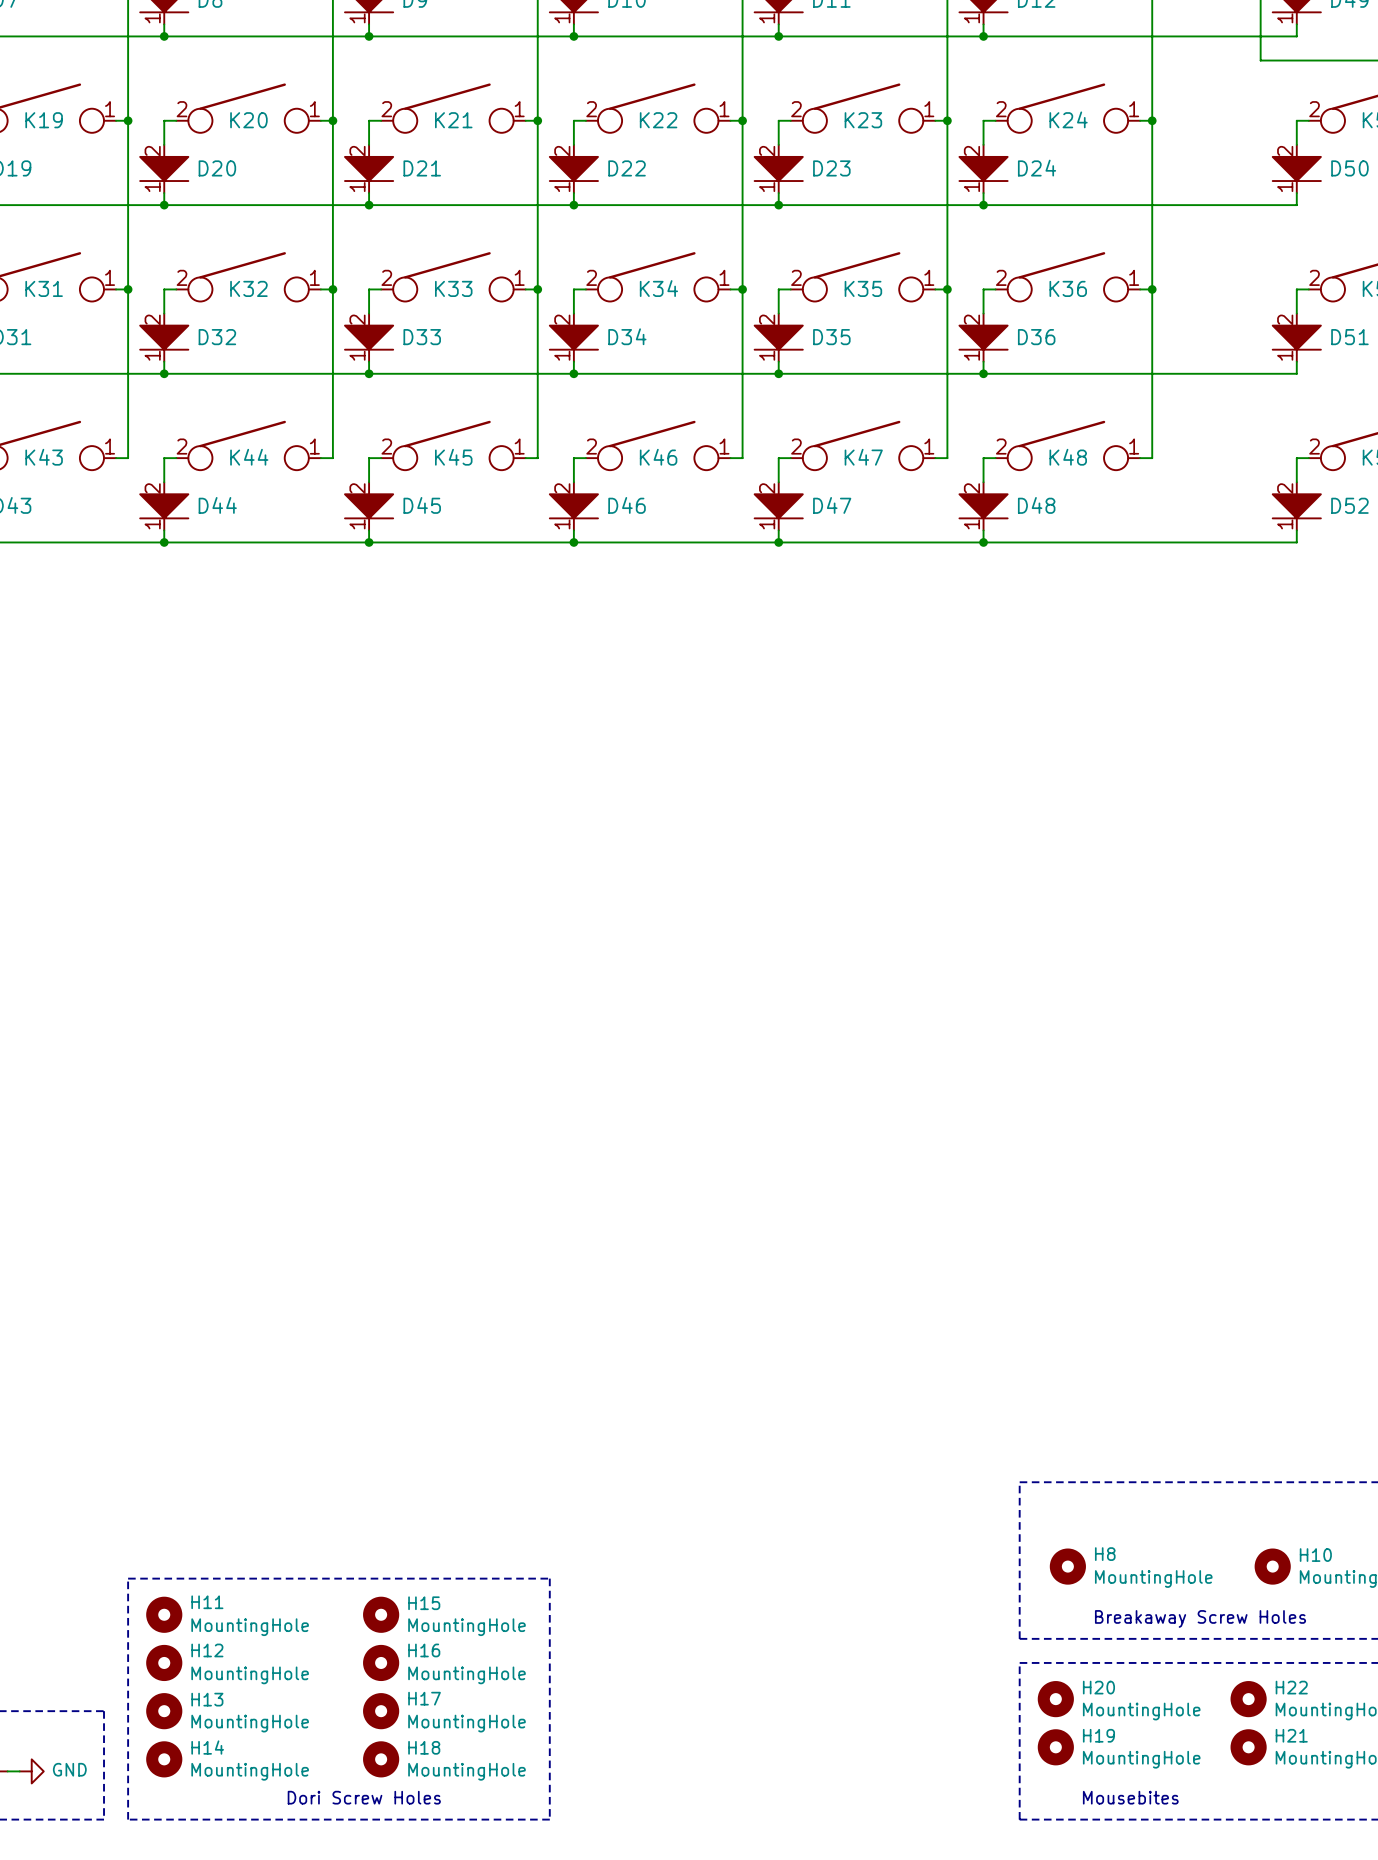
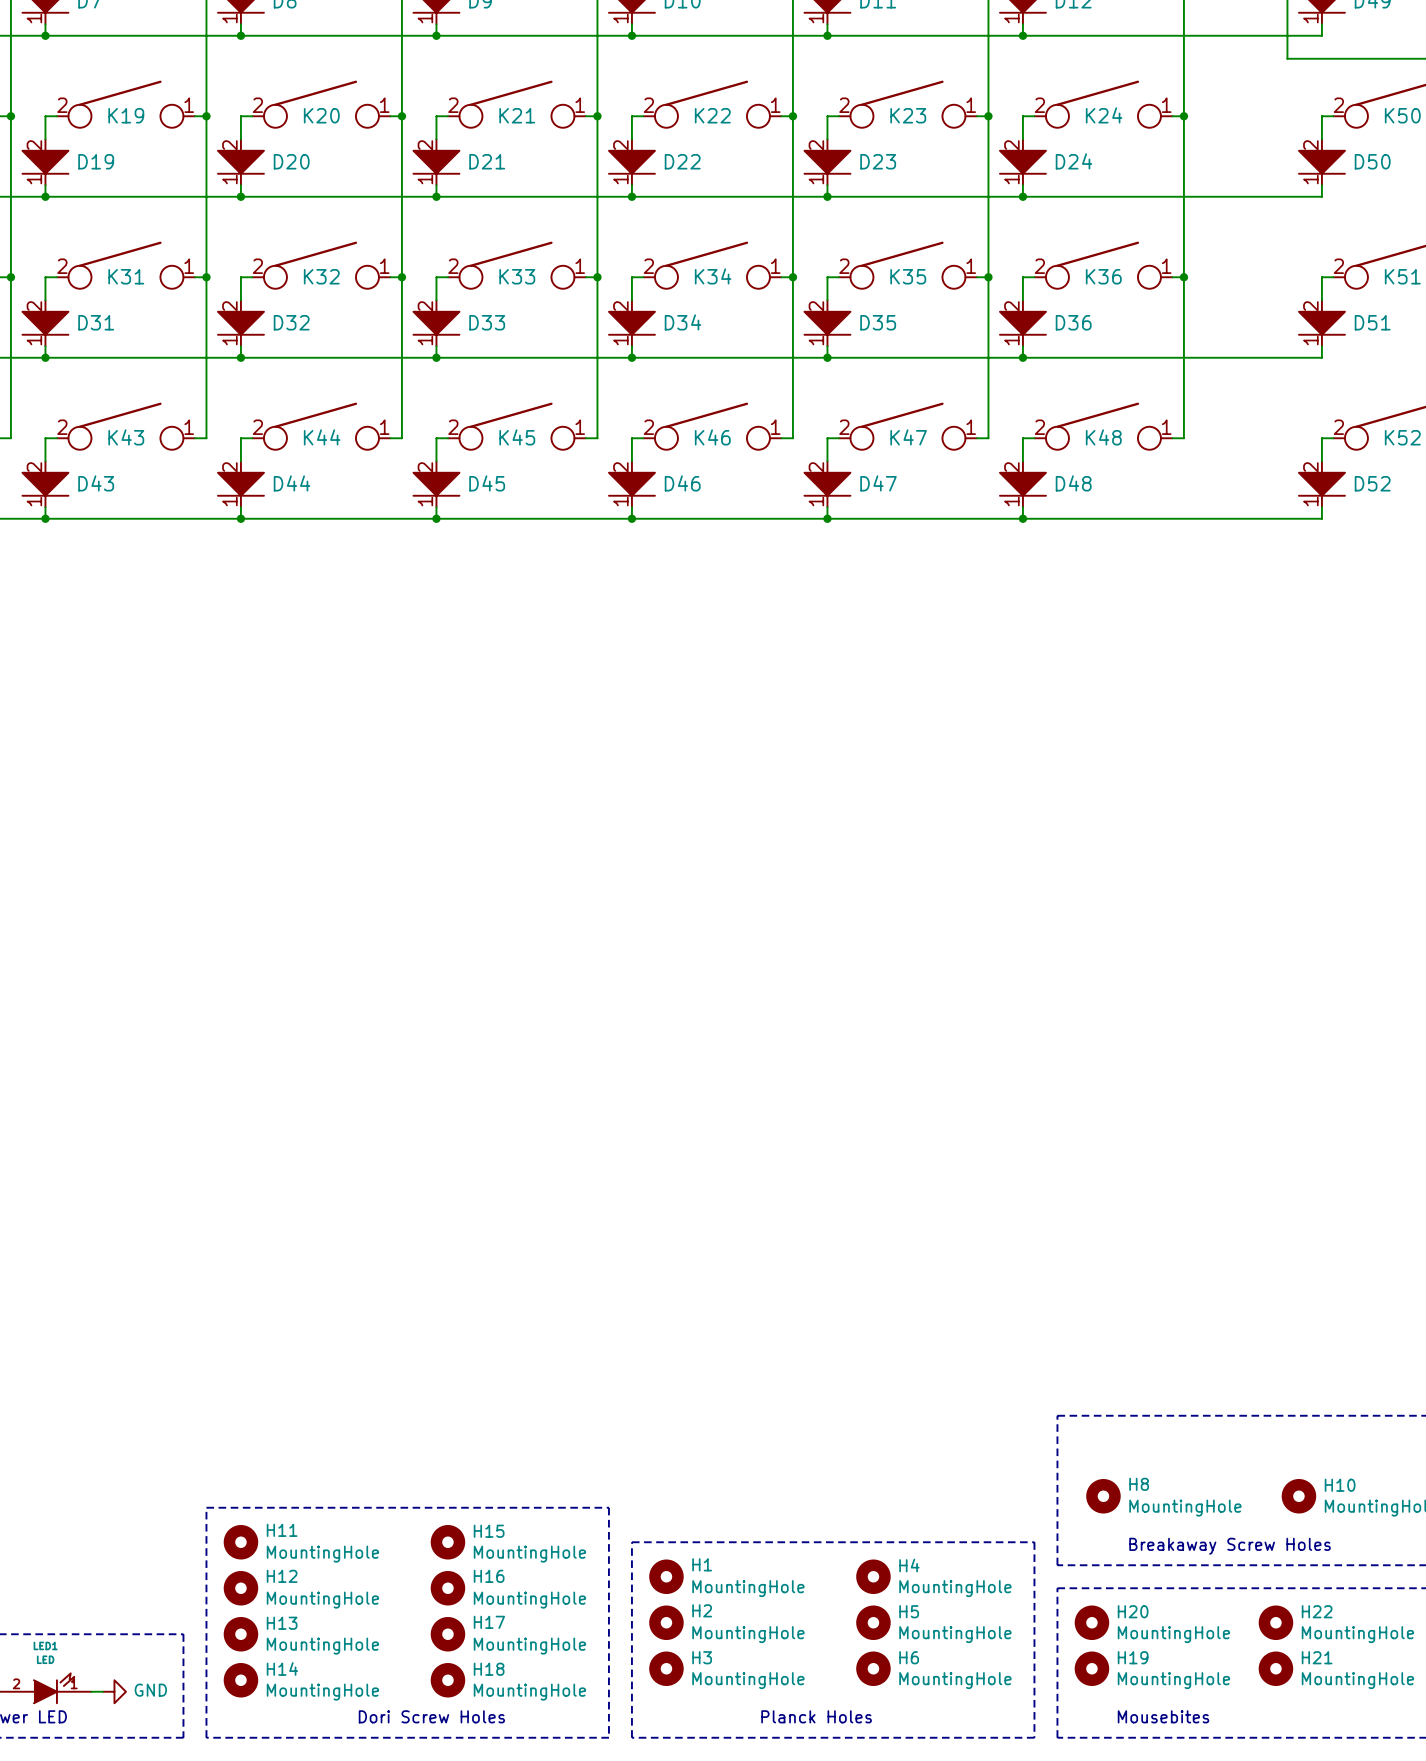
line: none -> (631, 1542) (631, 1737) (1034, 1737) (1034, 1542) (631, 1542)
H1: none -> MountingHole (666, 1576)
H4: none -> MountingHole (873, 1576)
H2: none -> MountingHole (666, 1622)
H5: none -> MountingHole (873, 1622)
H3: none -> MountingHole (666, 1668)
H6: none -> MountingHole (873, 1668)
text: none -> Planck Holes (816, 1716)

